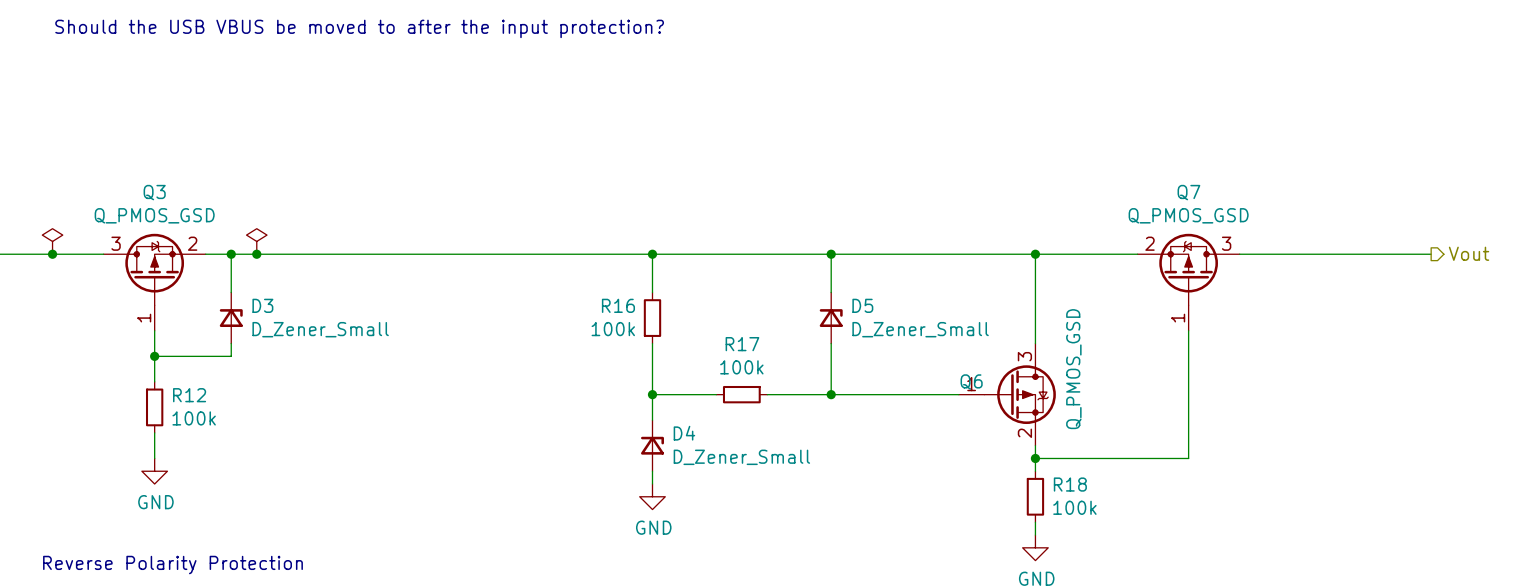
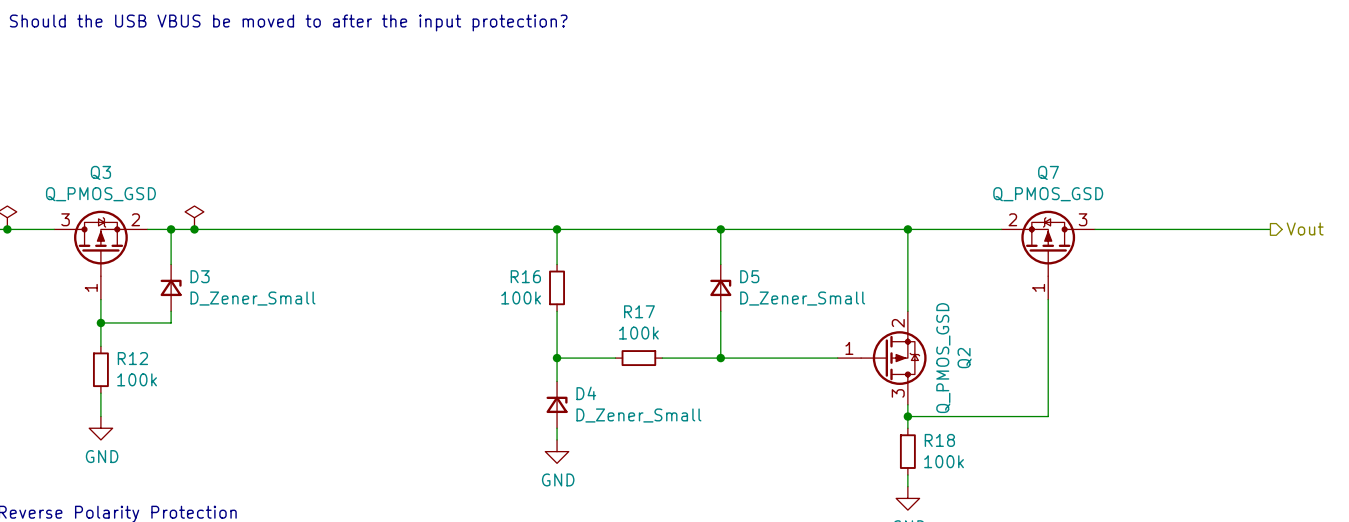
Q6: Q_PMOS_GSD (1007, 394) -> none
Q2: none -> Q_PMOS_GSD (882, 358)

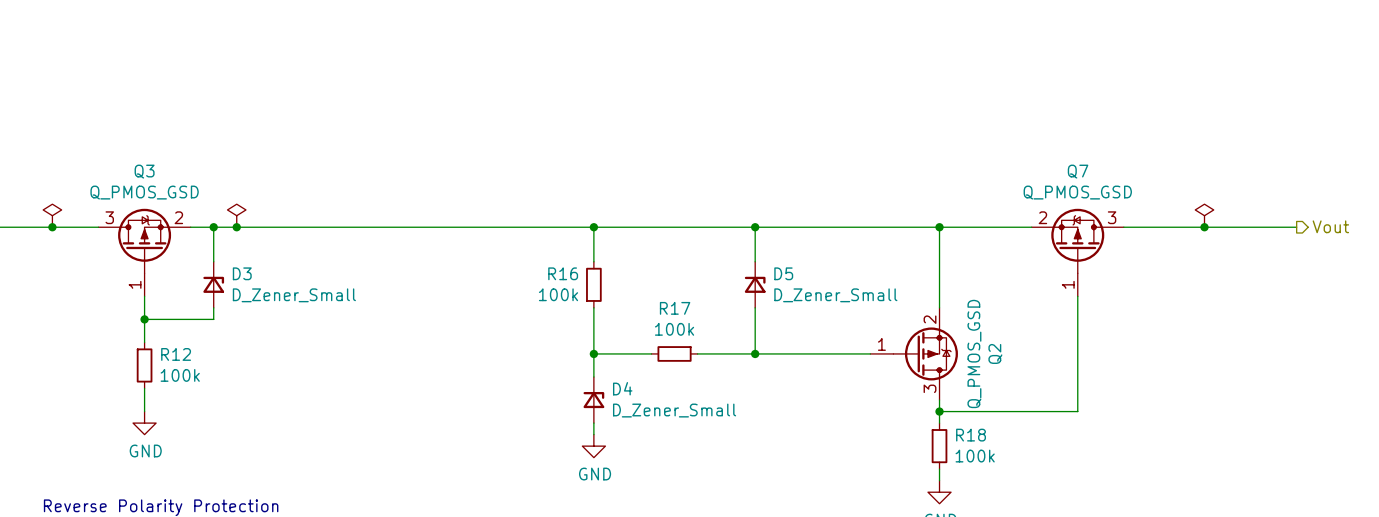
text: Should the USB VBUS be moved to after the input protection? (288, 22) -> none
power symbol: none -> (1204, 215)
junction: none -> (1204, 227)

